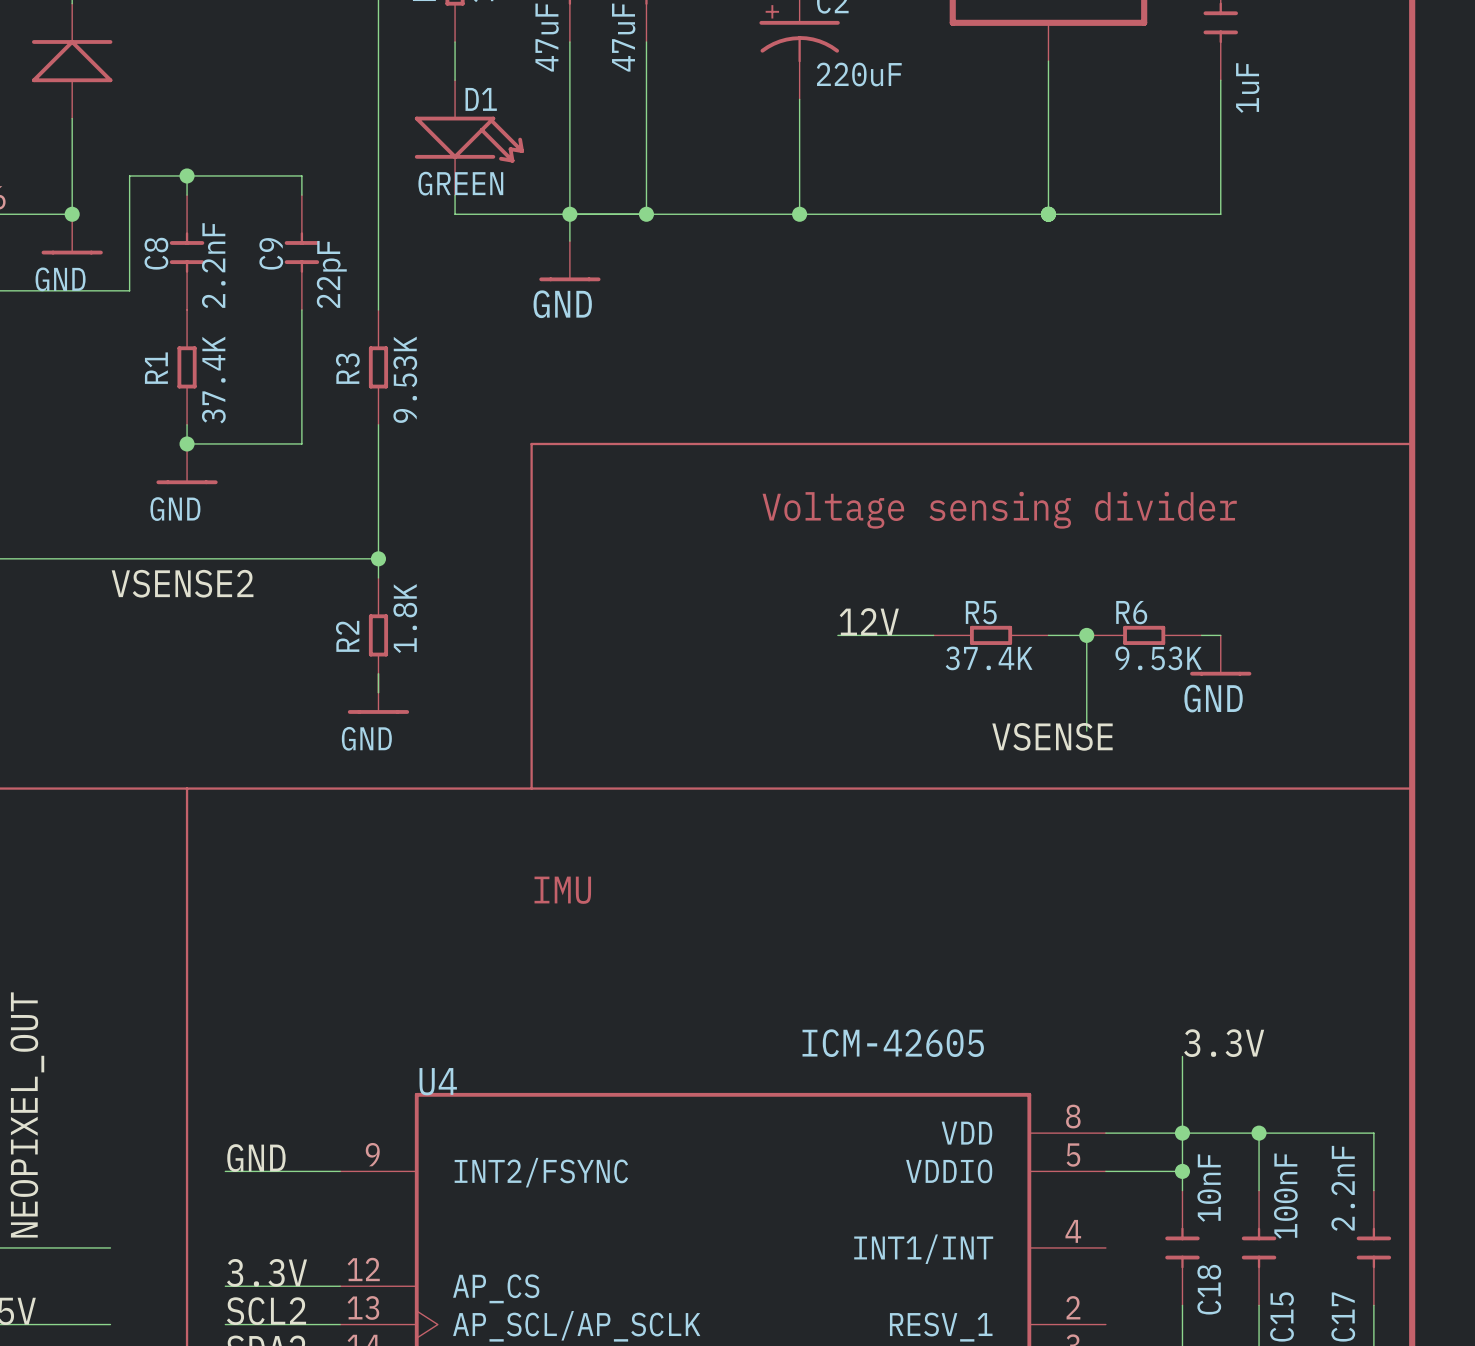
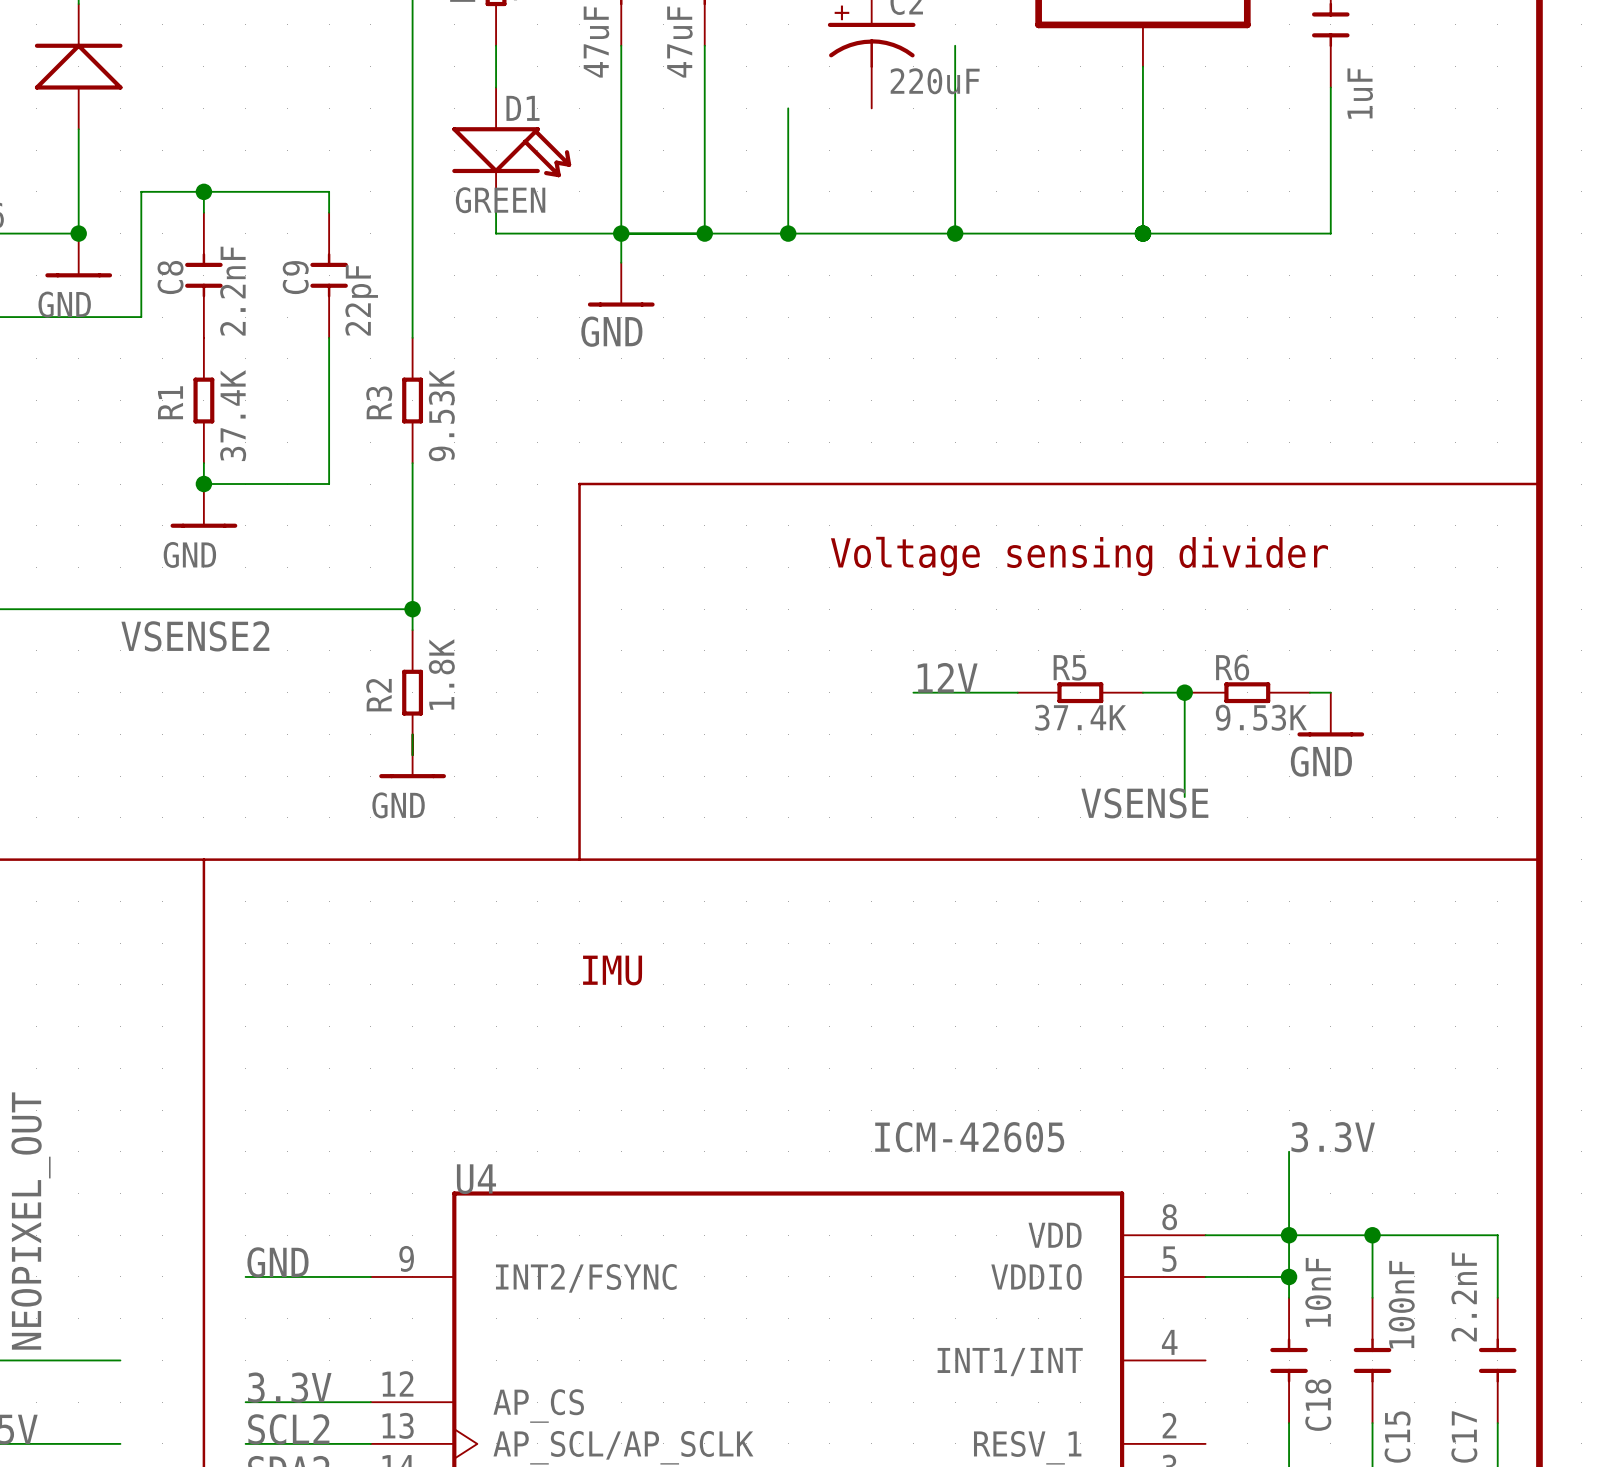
wire: none -> (955, 45) (955, 233)
wire: (799, 99) (799, 214) -> (788, 108) (788, 233)
junction: none -> (788, 233)
junction: (799, 214) -> none
junction: none -> (955, 233)

